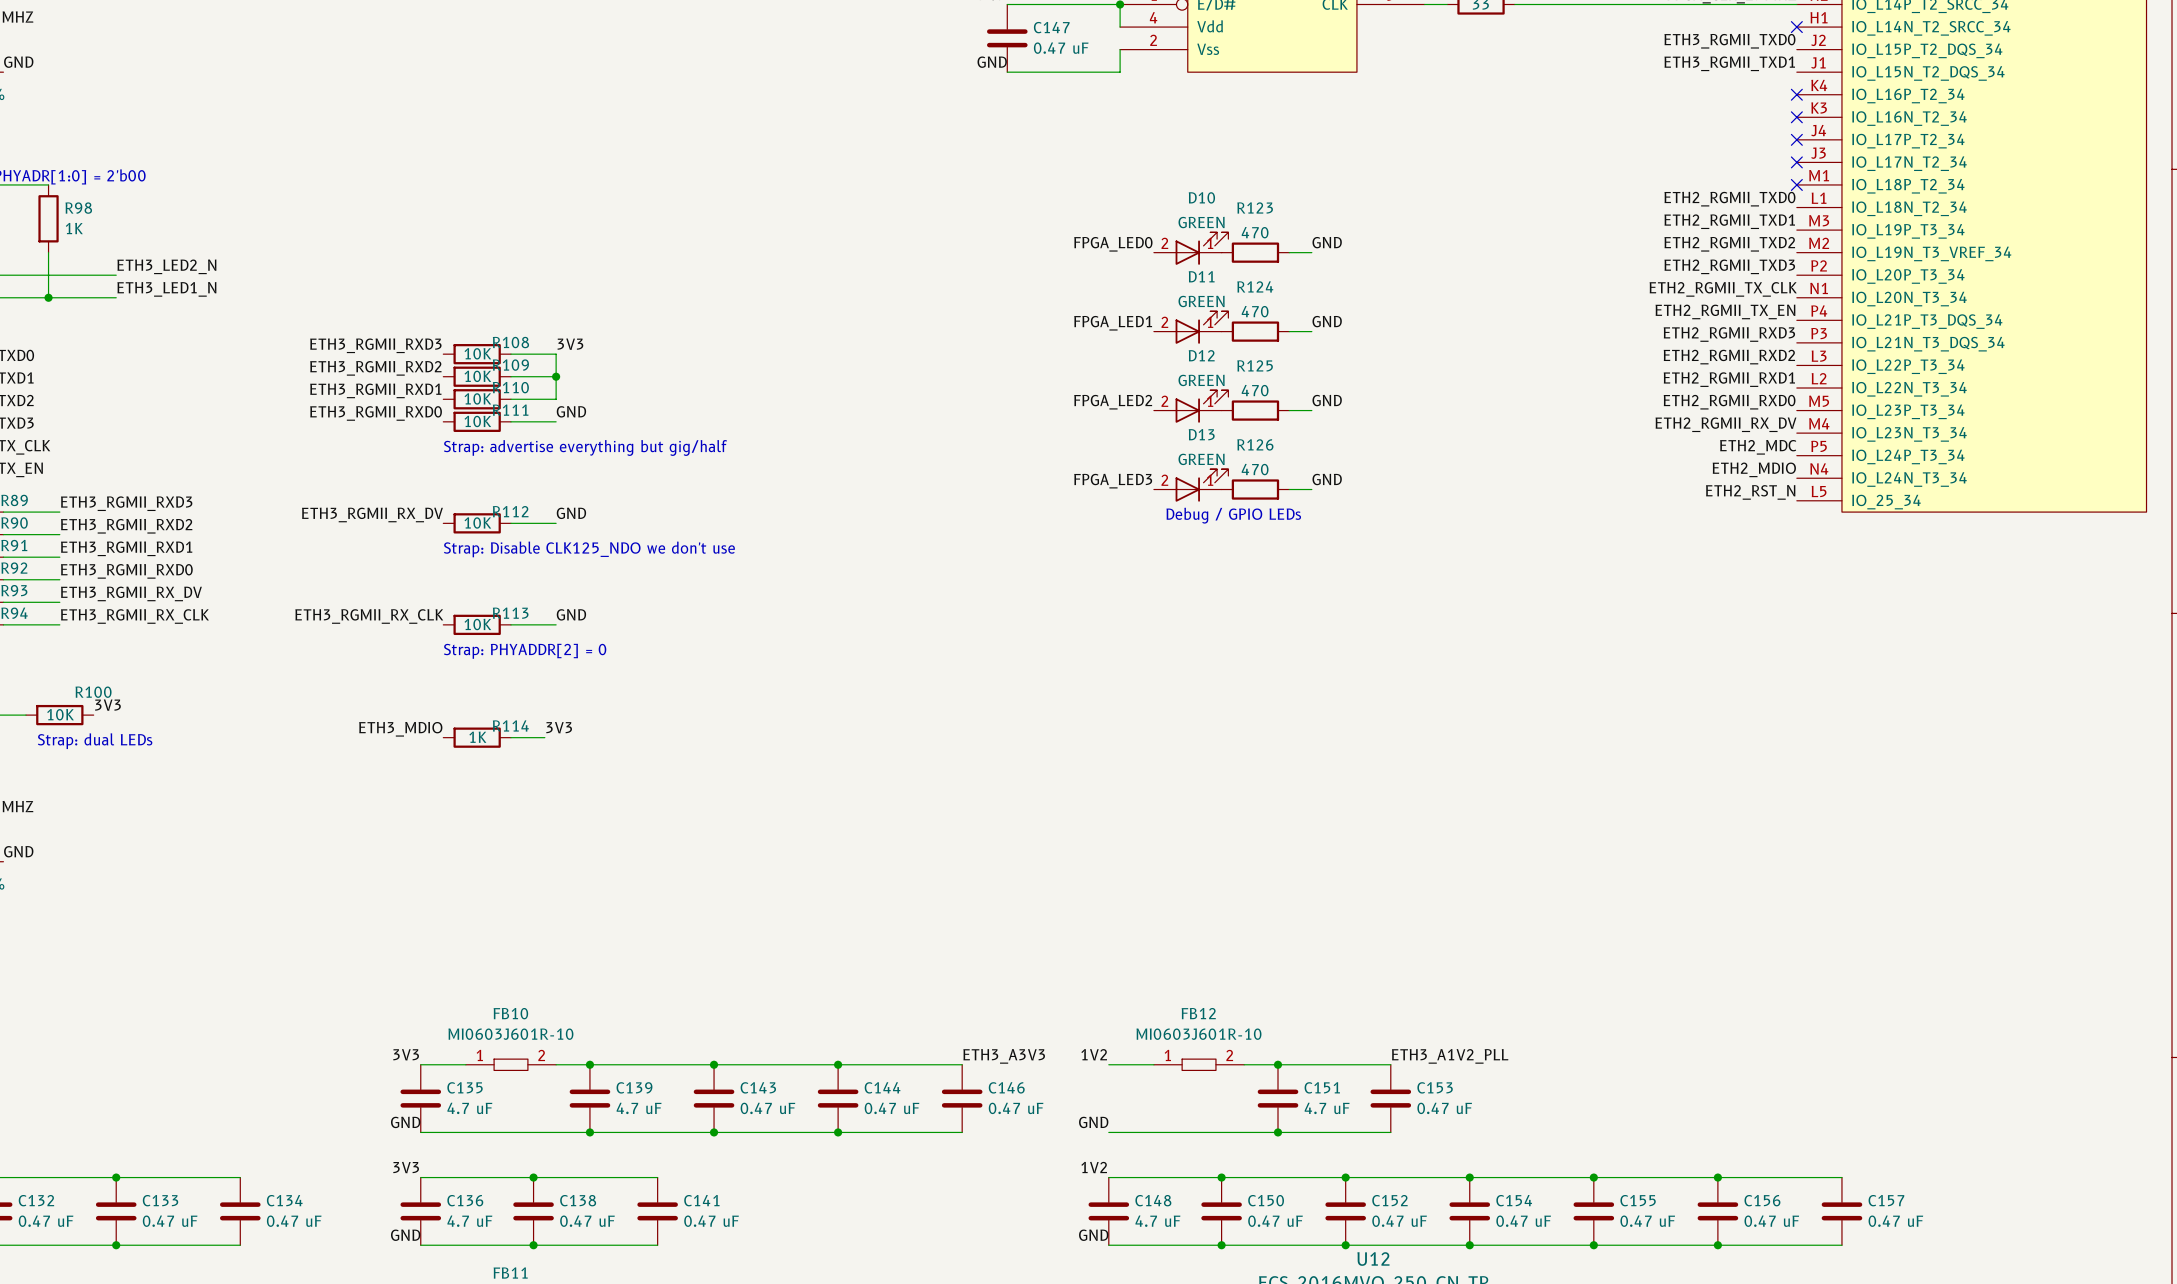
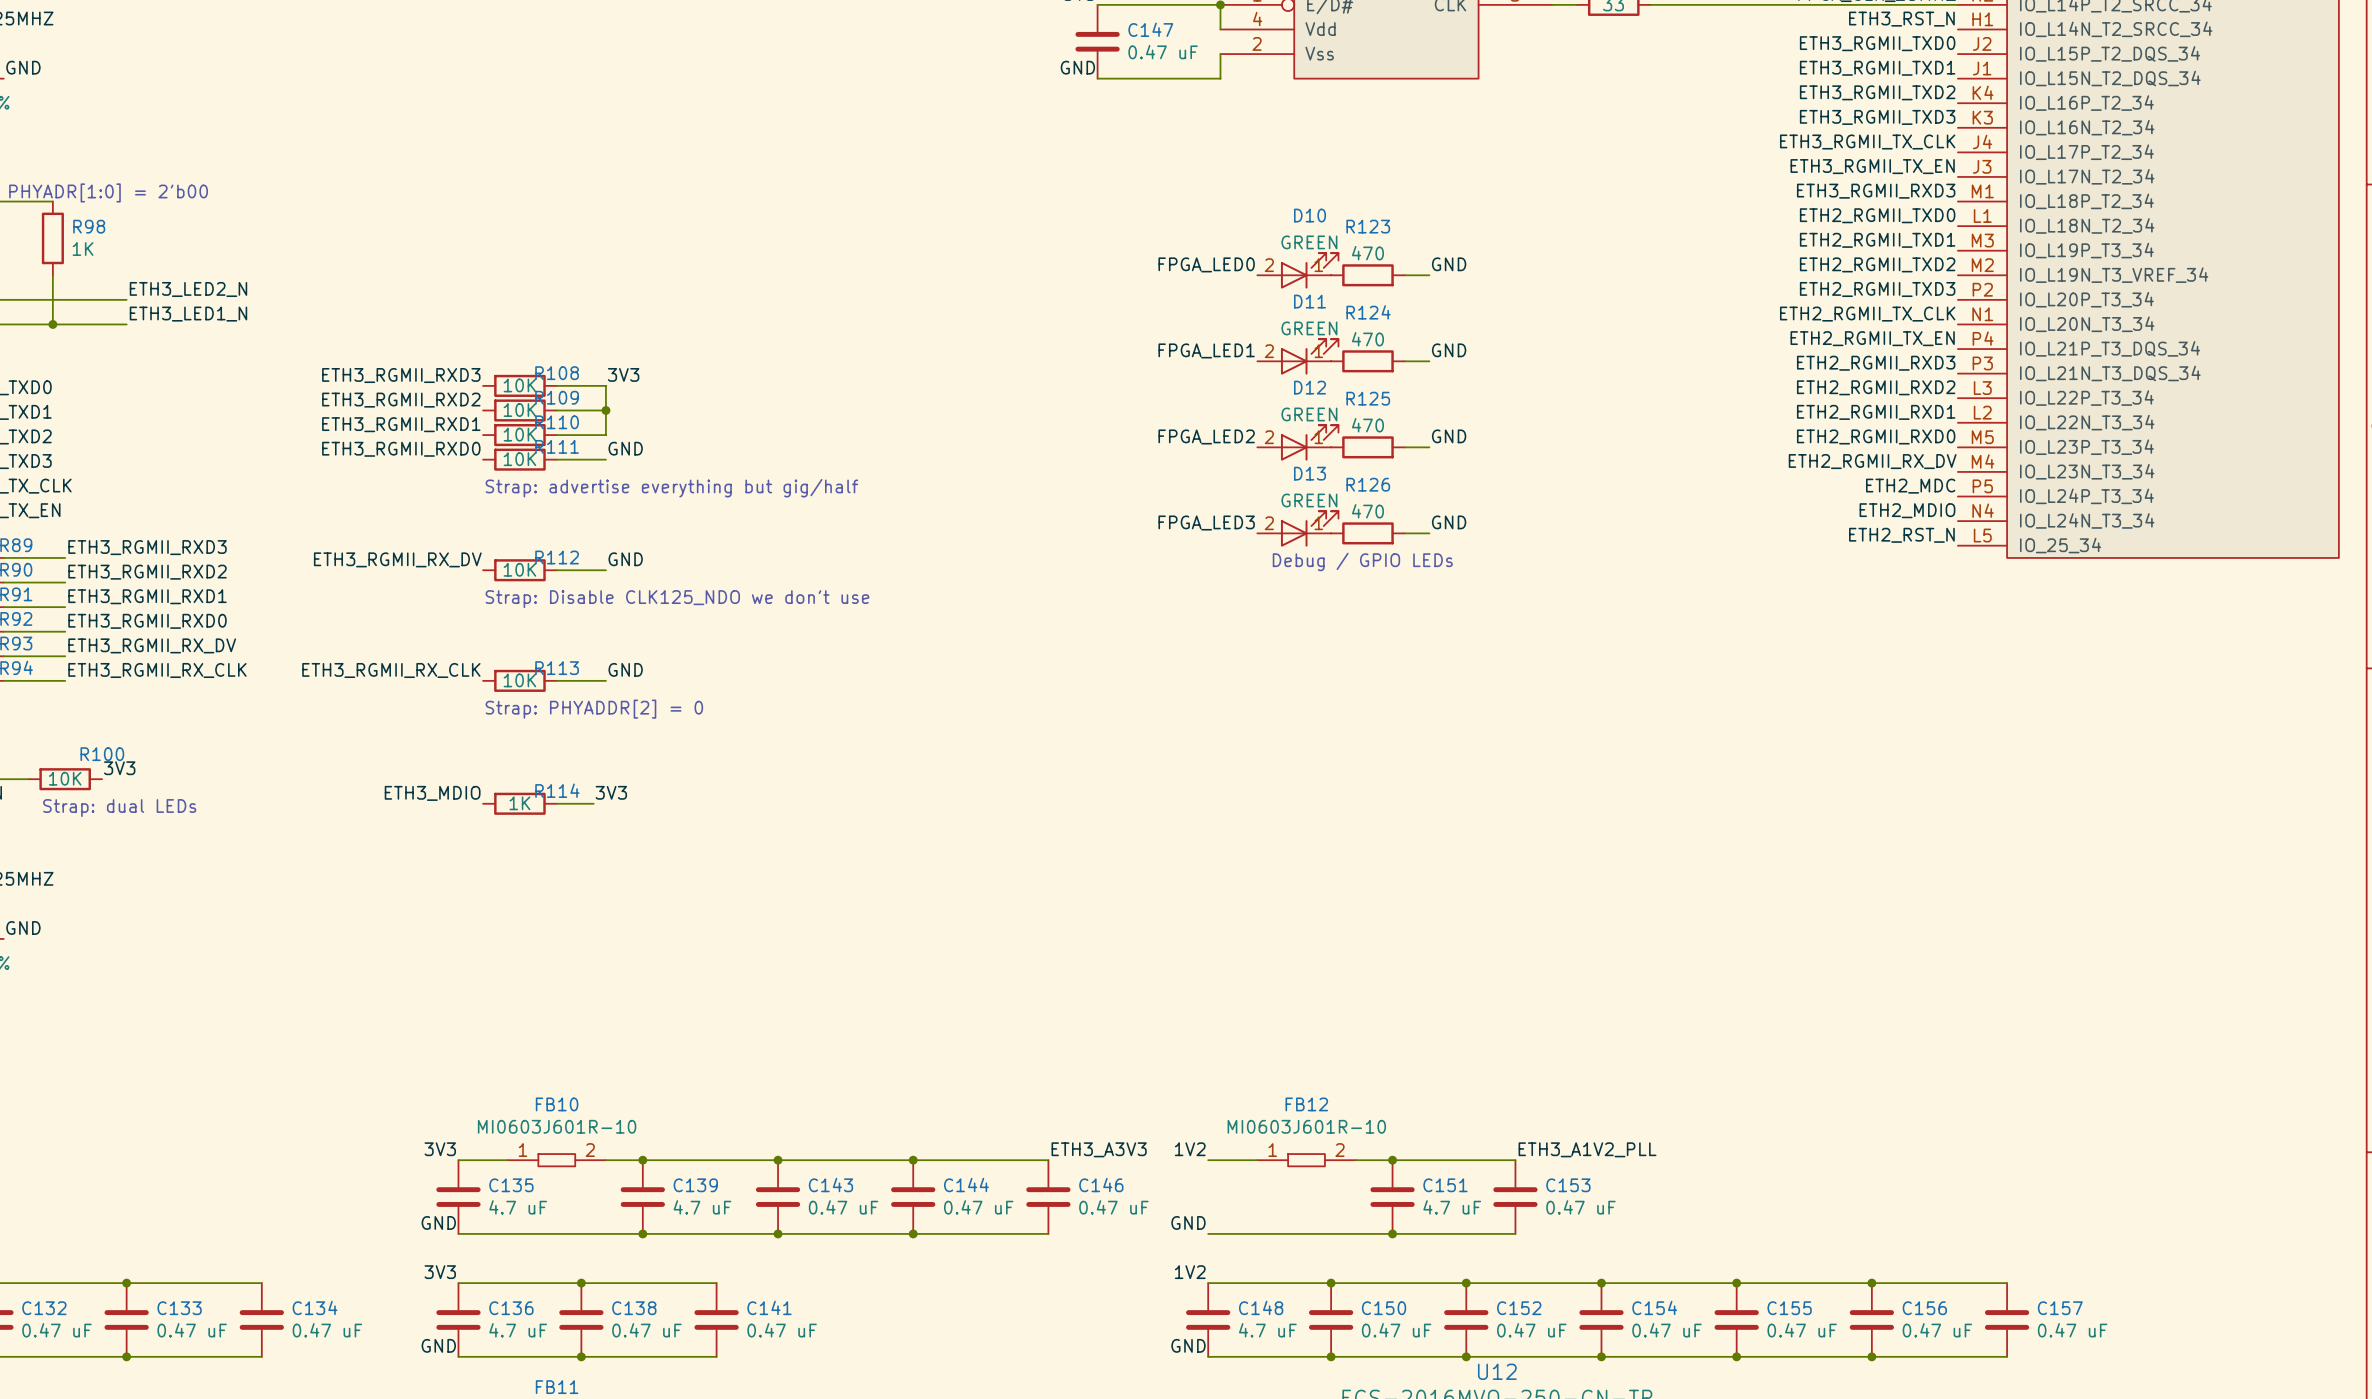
label: none -> ETH3_RST_N (1901, 19)
no-connect mark: (1796, 27) -> none
label: none -> ETH3_RGMII_TXD2 (1877, 92)
no-connect mark: (1796, 94) -> none
label: none -> ETH3_RGMII_TXD3 (1877, 117)
no-connect mark: (1796, 117) -> none
label: none -> ETH3_RGMII_TX_CLK (1867, 142)
no-connect mark: (1796, 139) -> none
label: none -> ETH3_RGMII_TX_EN (1872, 166)
no-connect mark: (1796, 162) -> none
label: none -> ETH3_RGMII_RXD3 (1876, 191)
no-connect mark: (1796, 184) -> none

